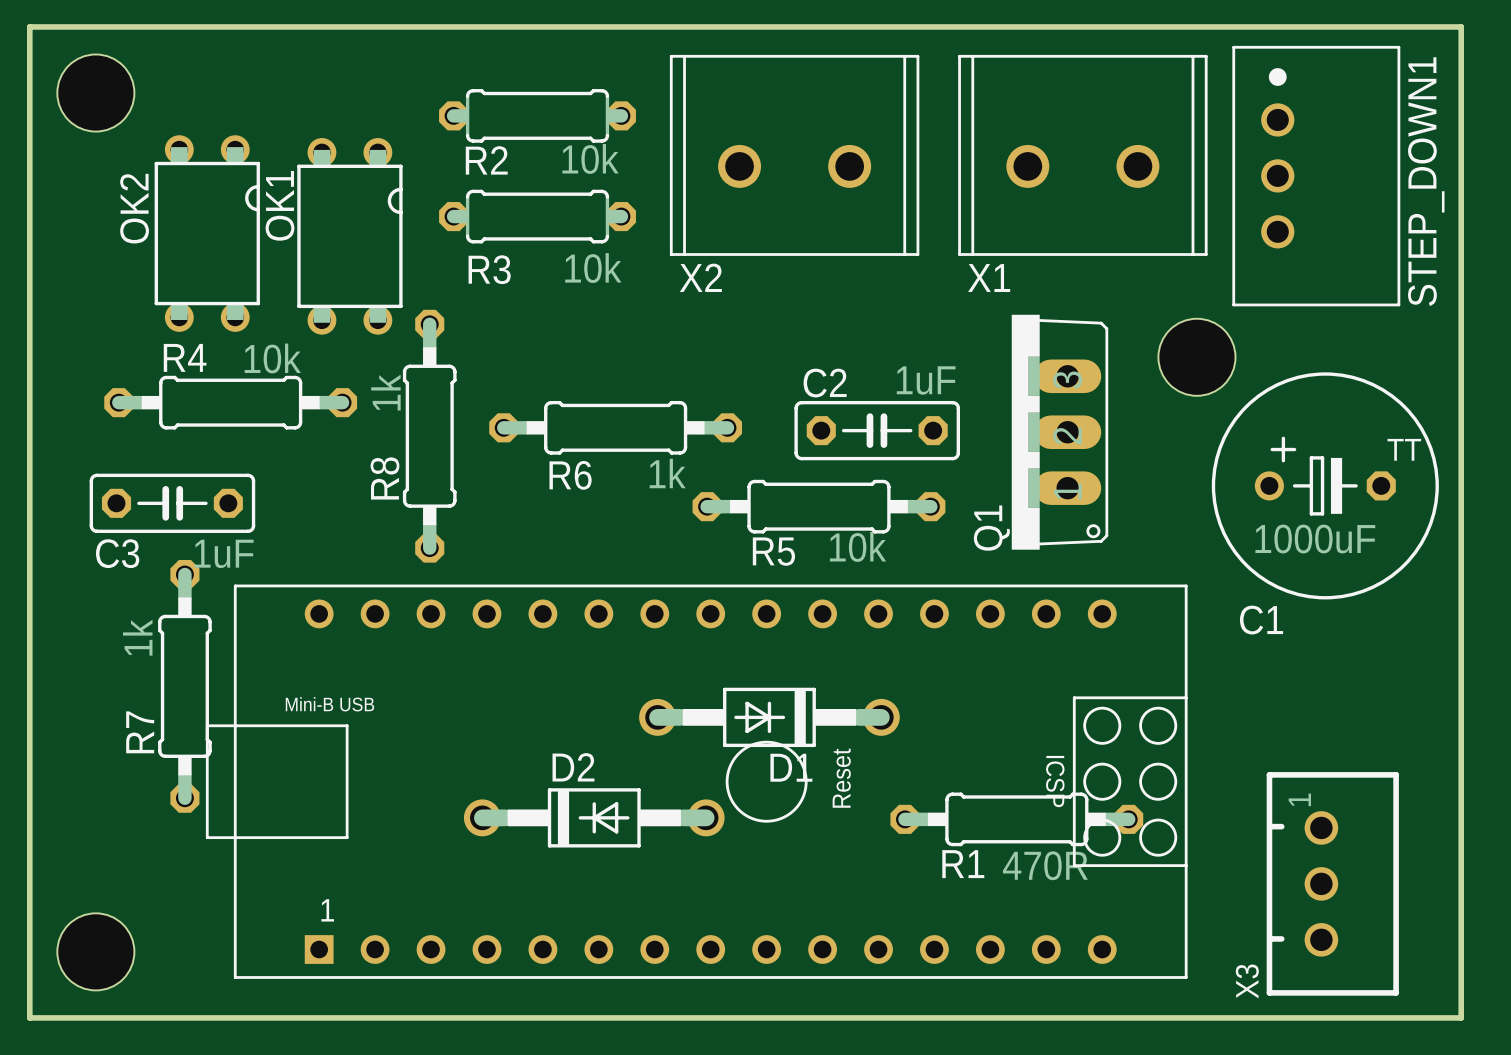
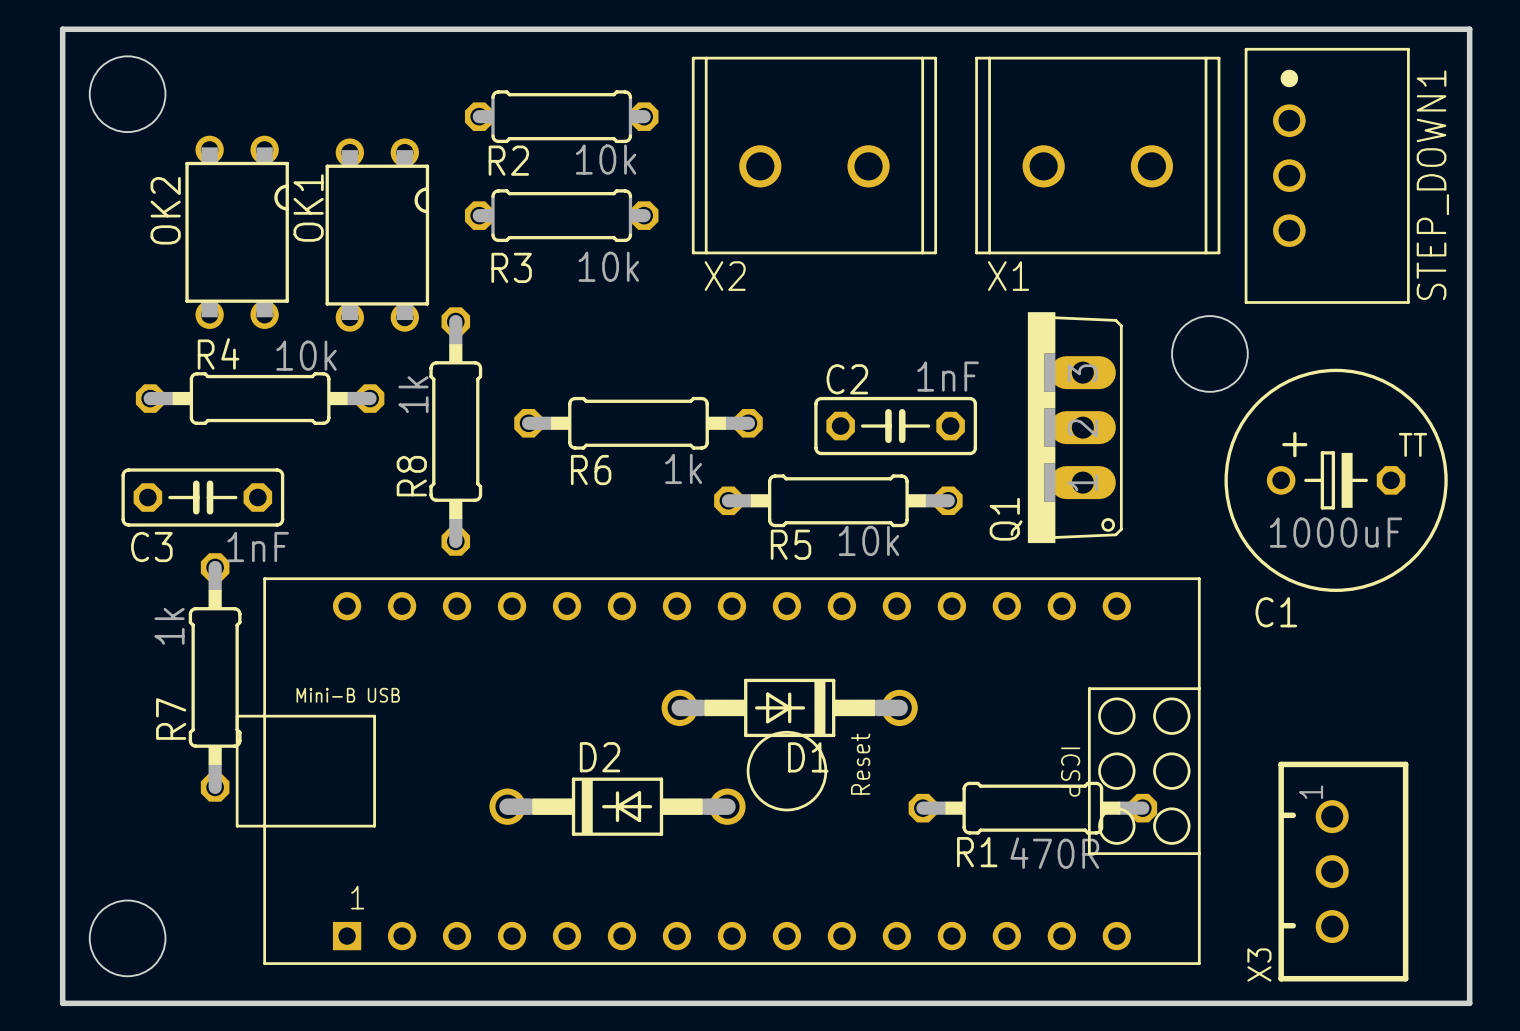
C2 value: 1uF (926, 380) -> 1nF (948, 376)
C3 value: 1uF (224, 553) -> 1nF (258, 547)

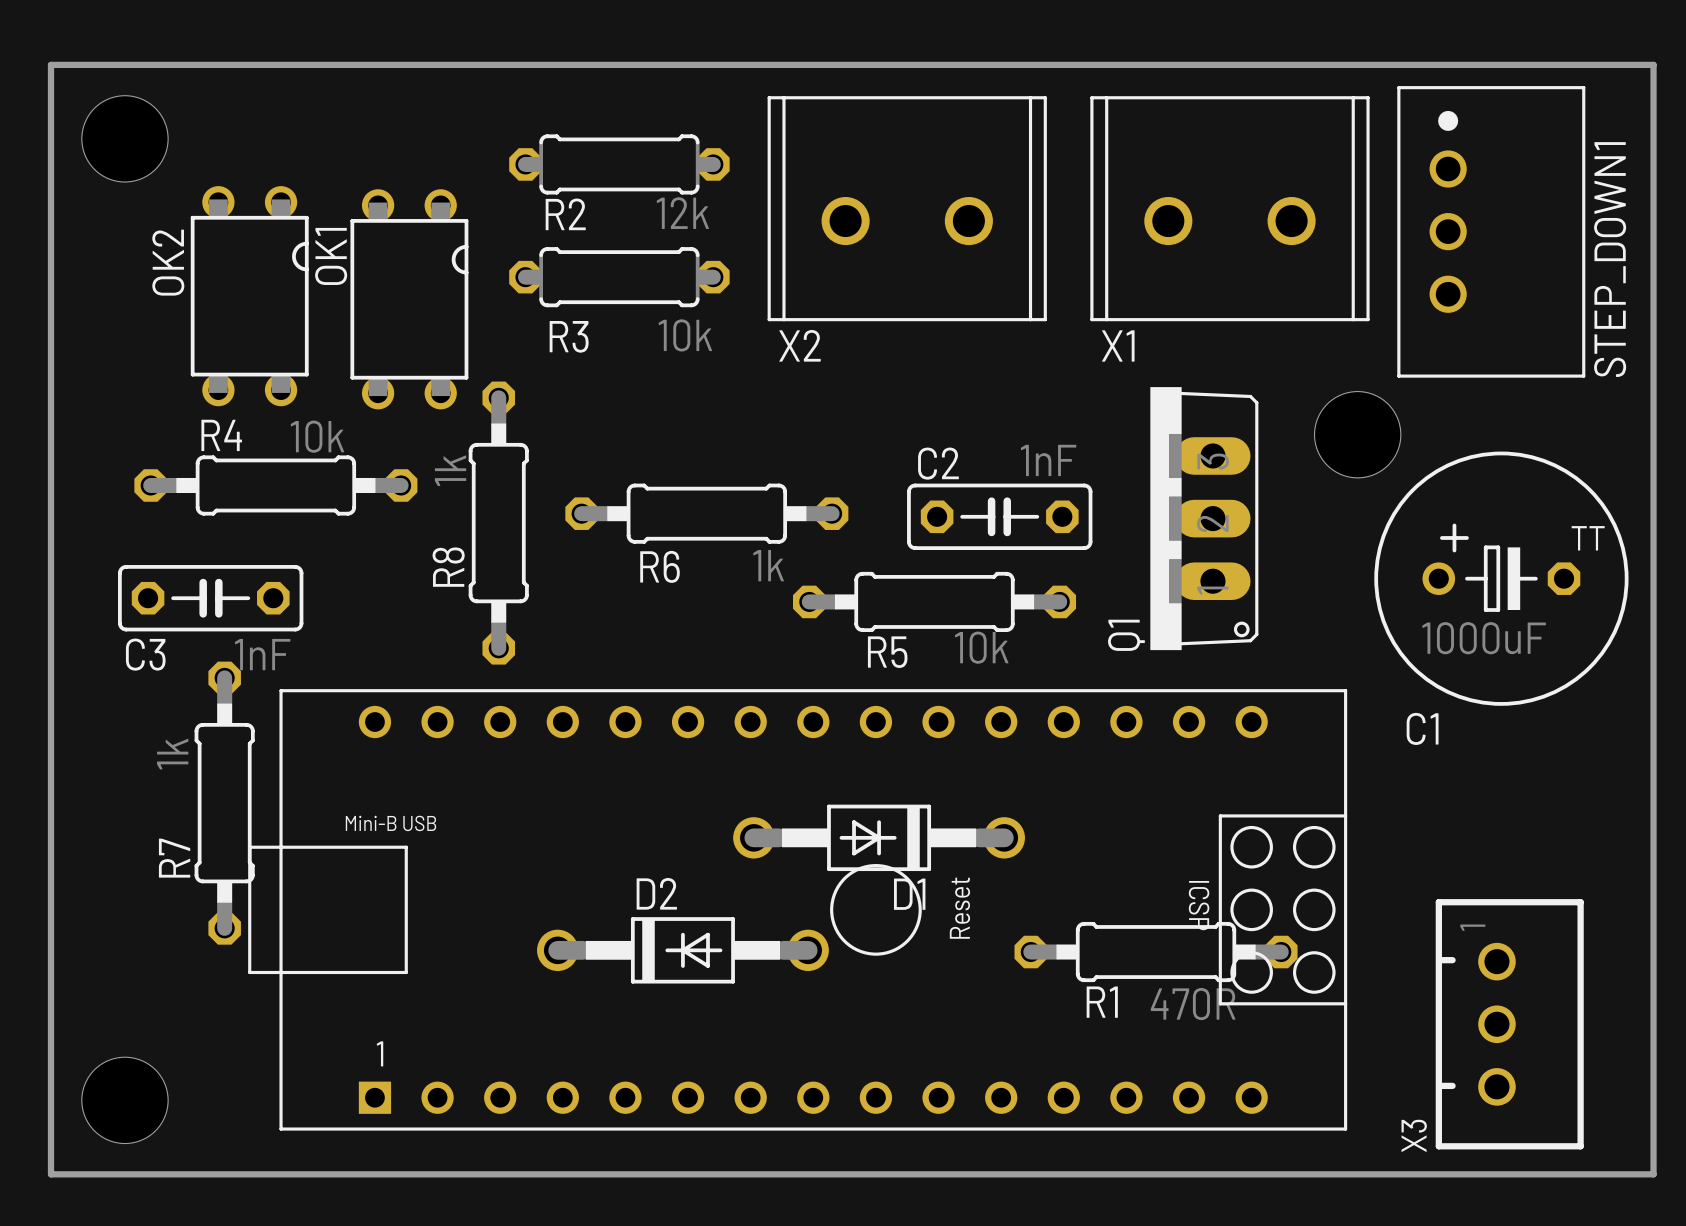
R2 value: 10k (606, 159) -> 12k (682, 213)

